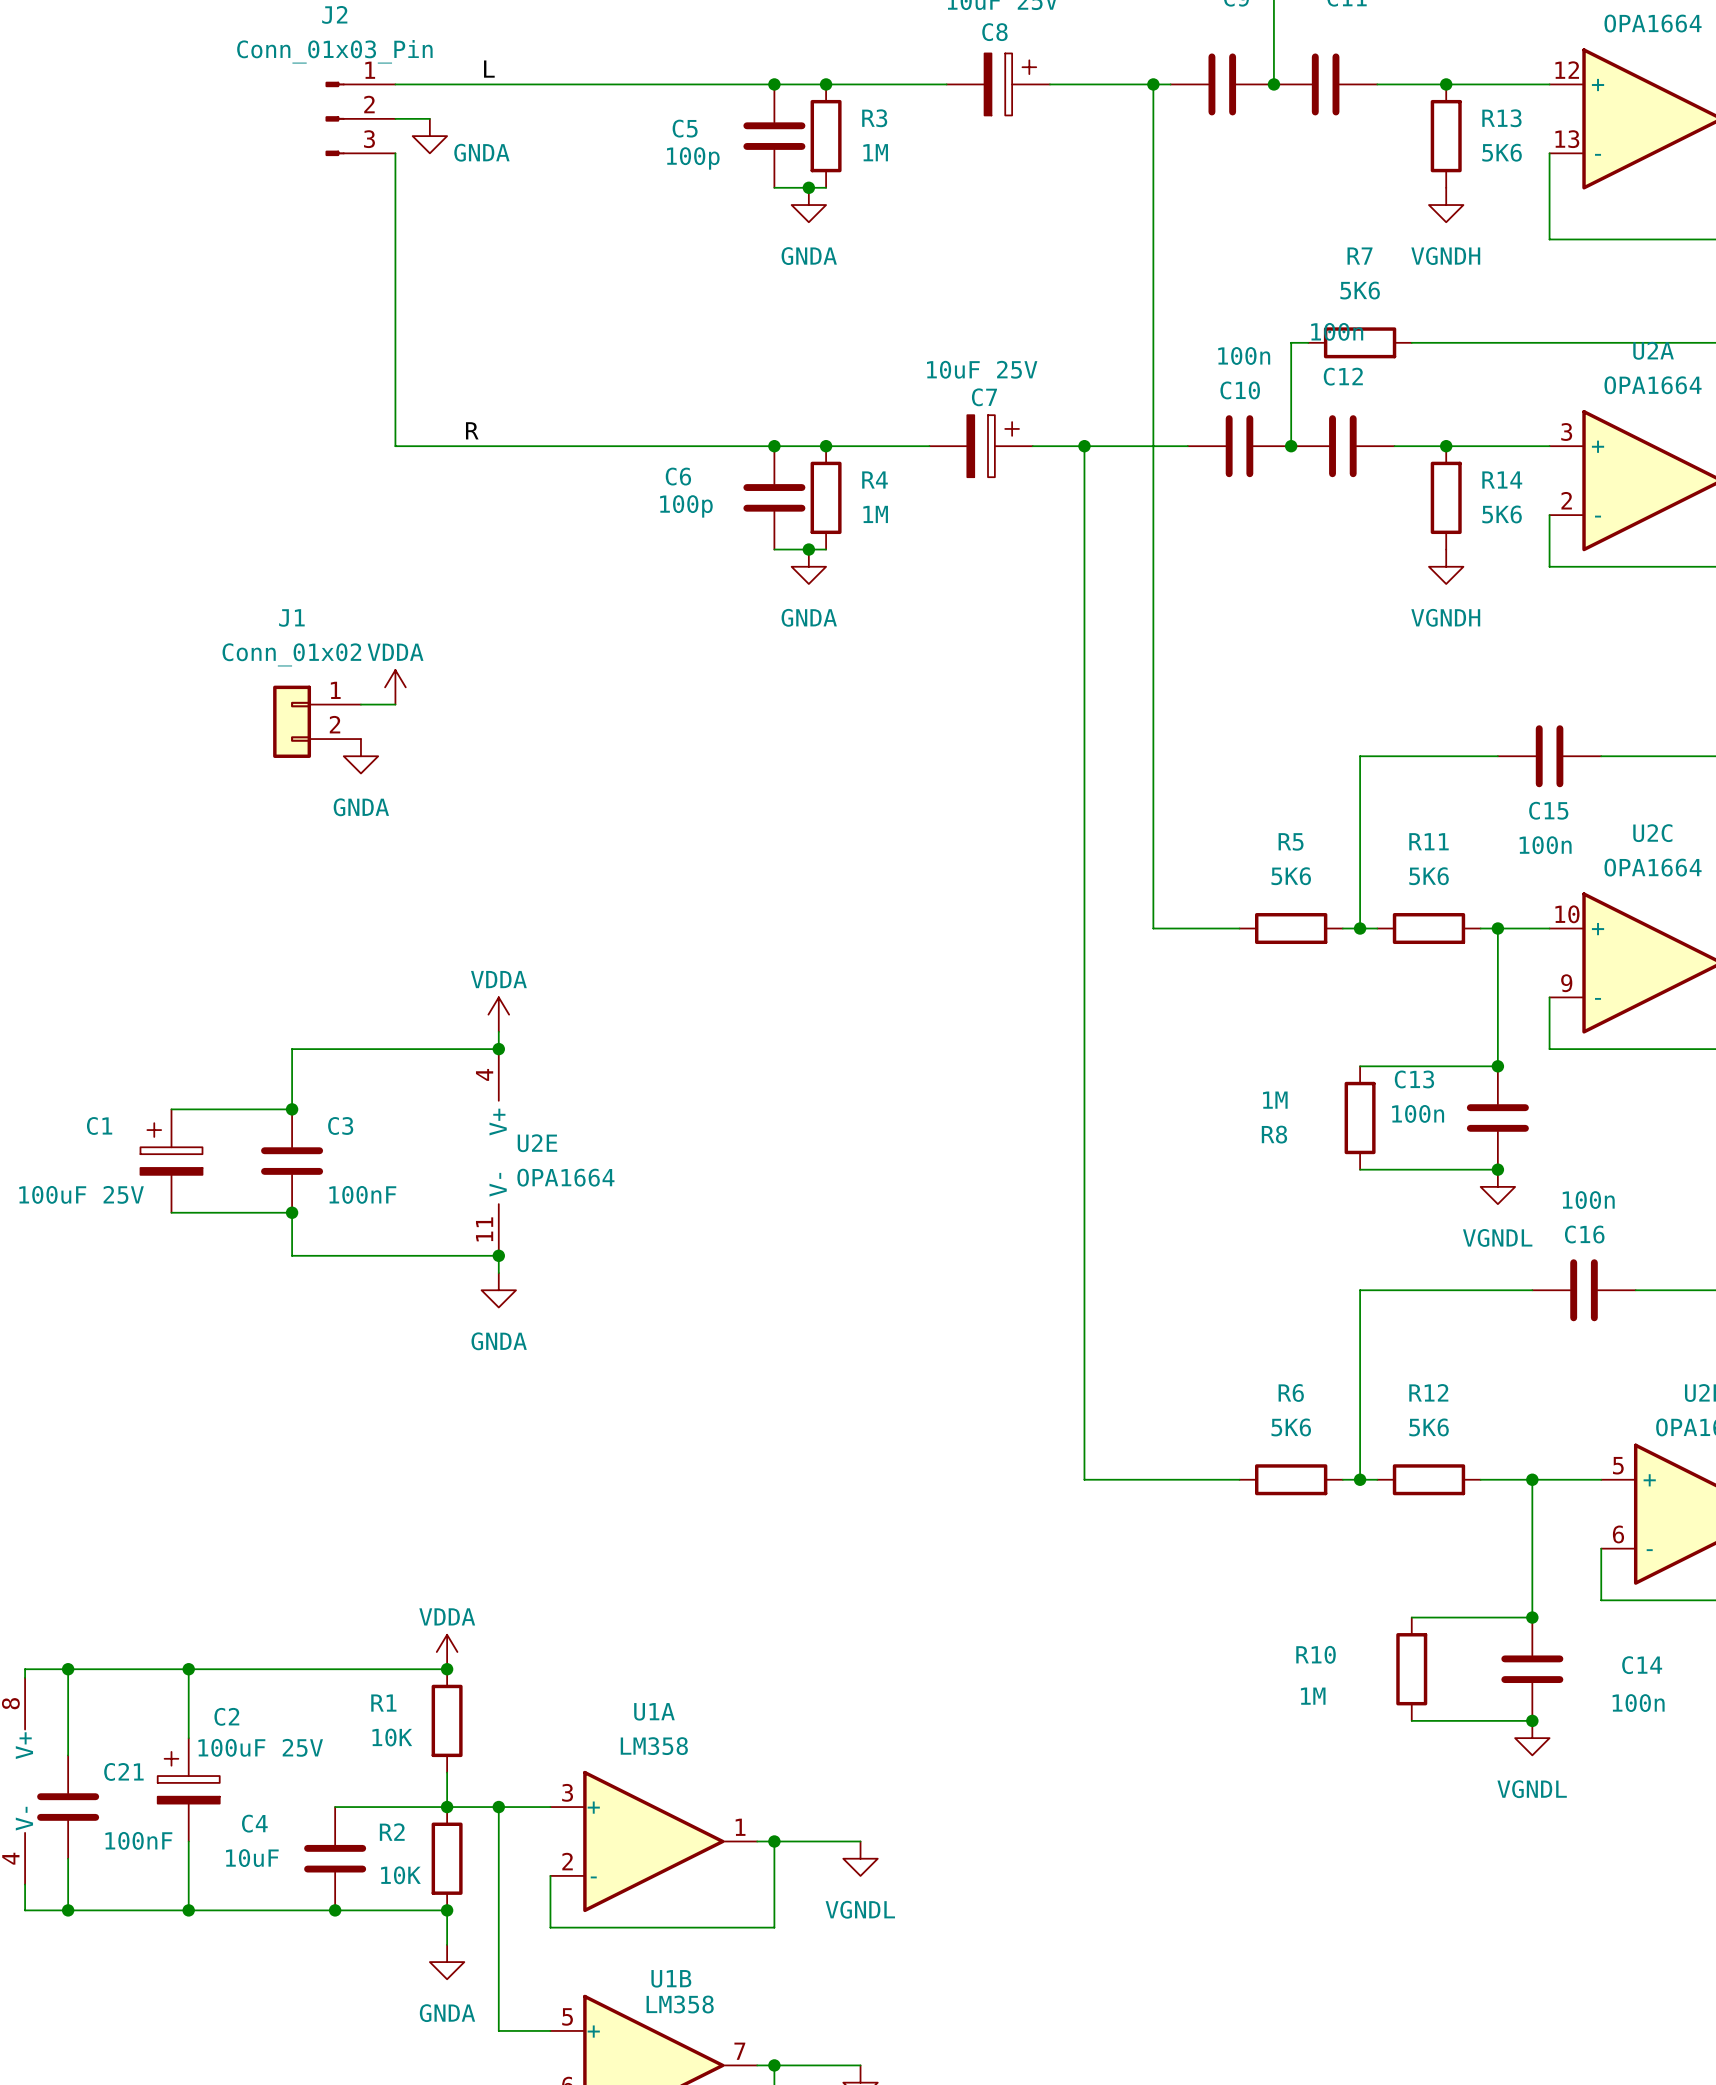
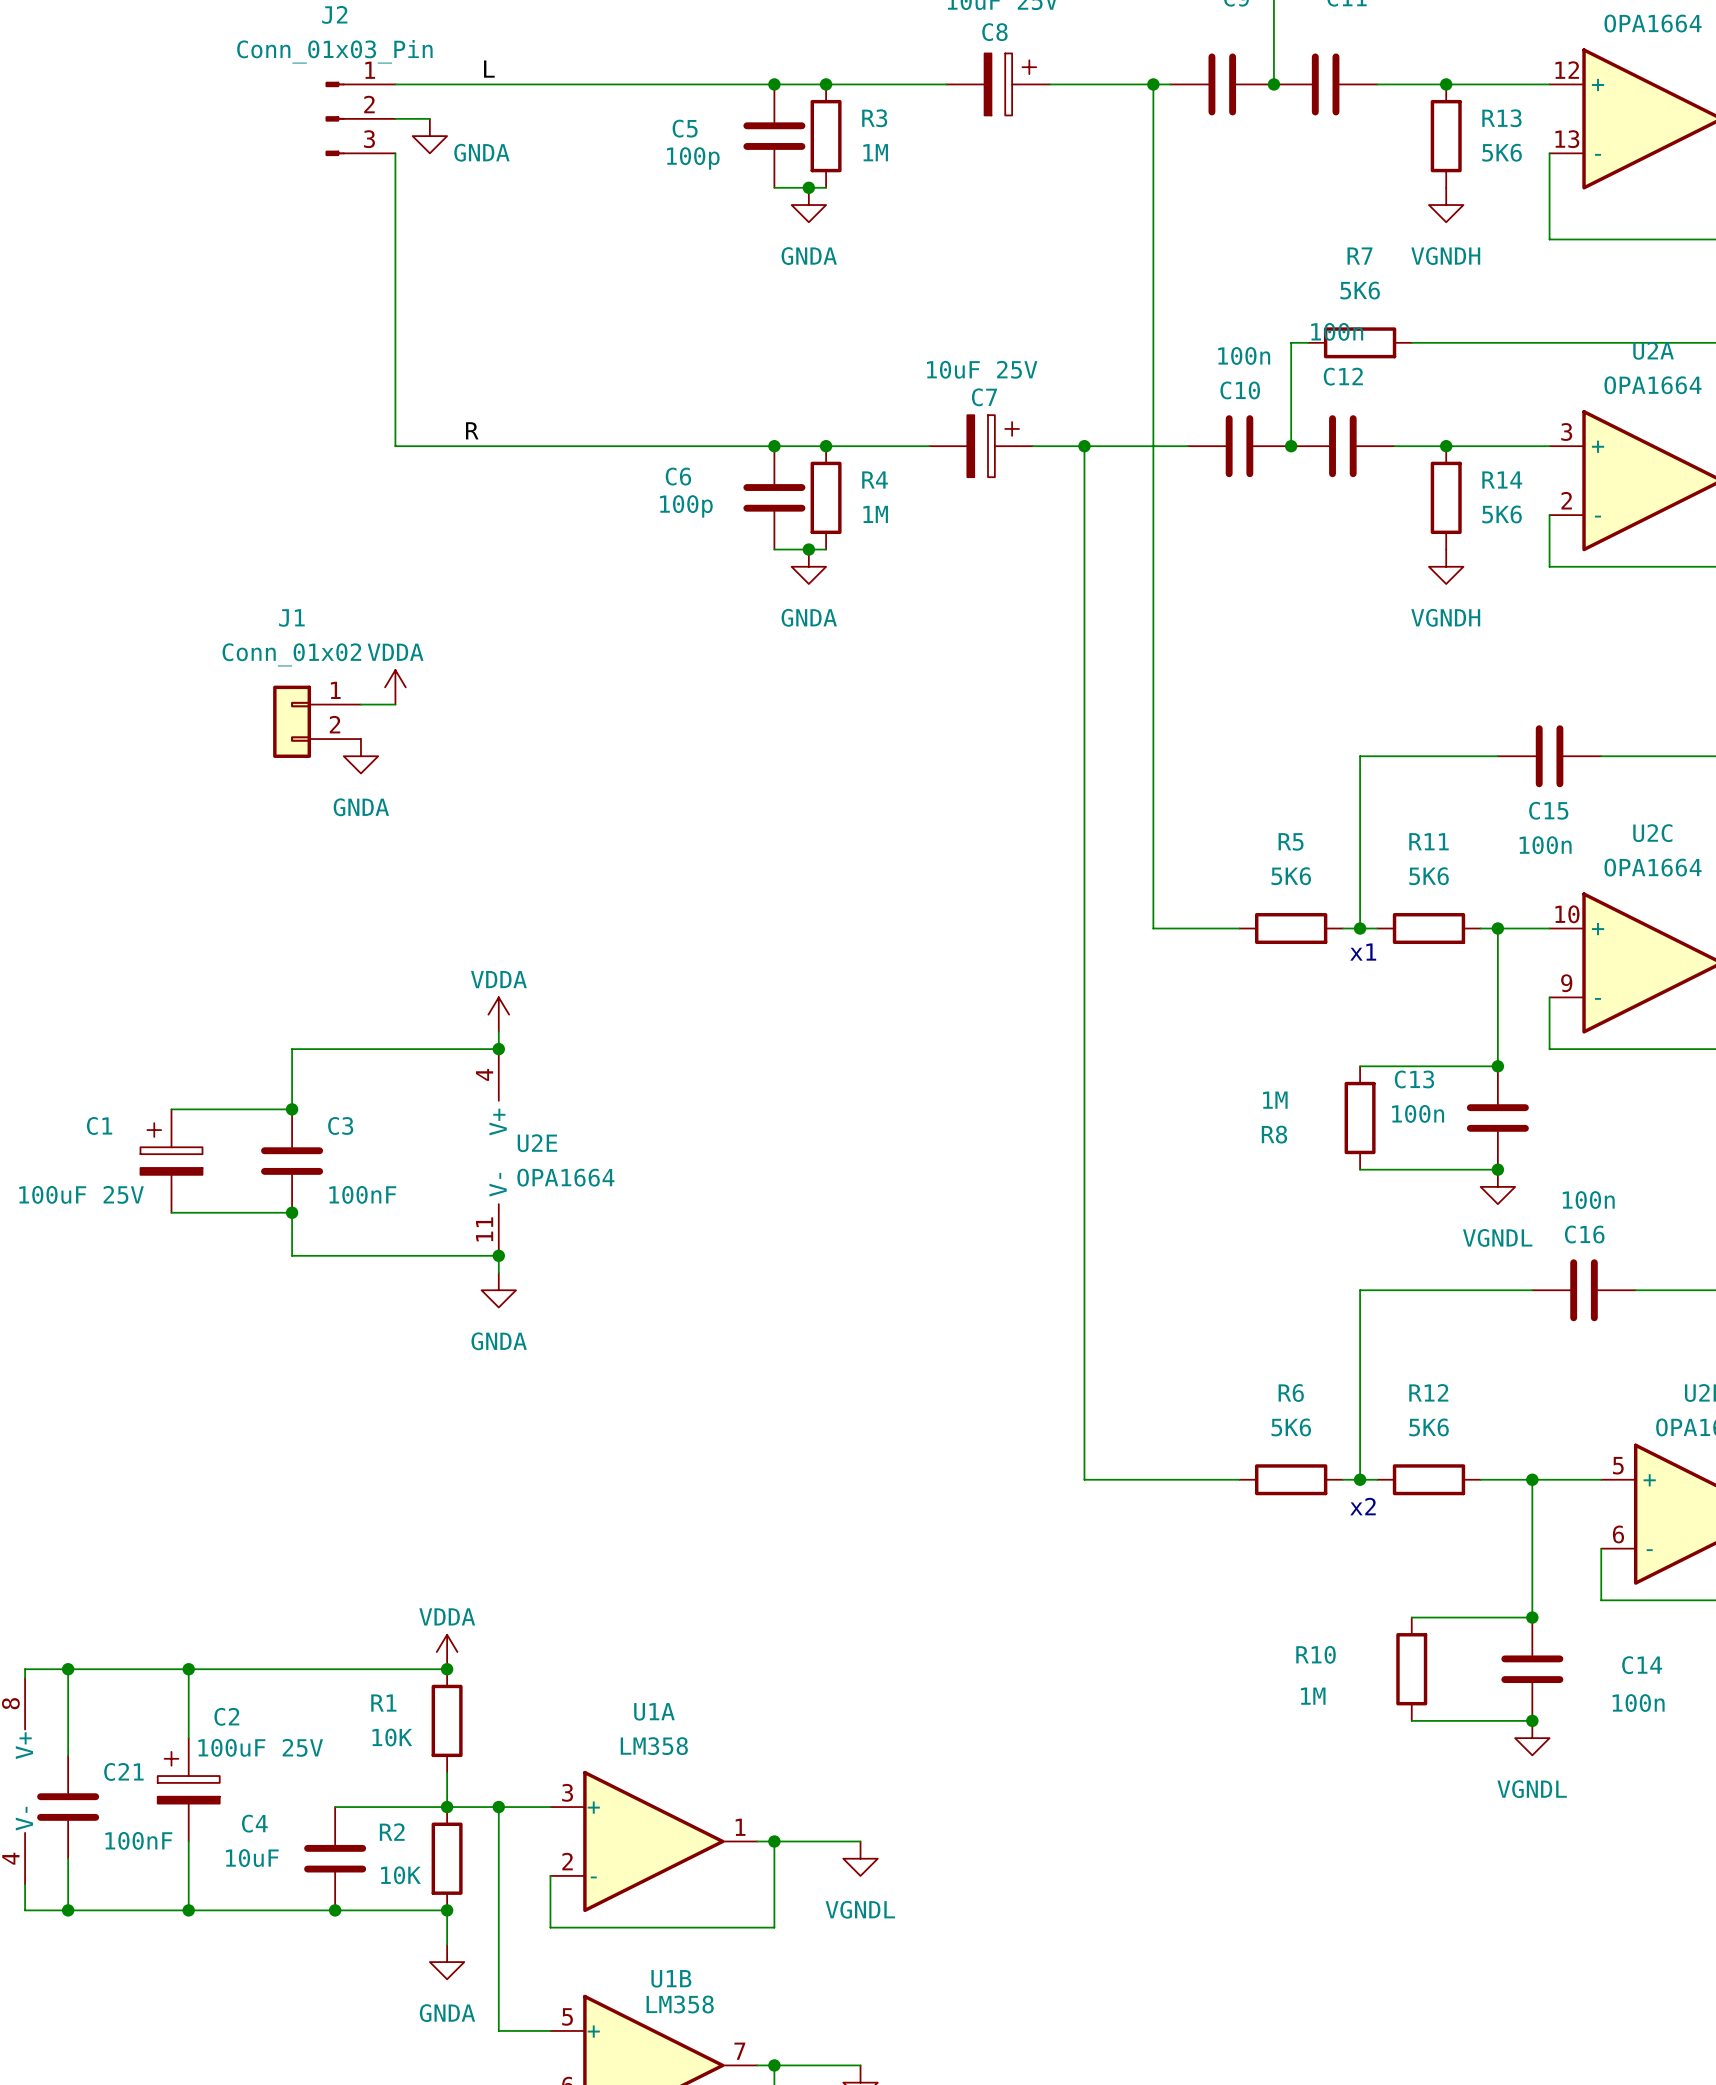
text: none -> x1 (1363, 952)
text: none -> x2 (1362, 1506)

